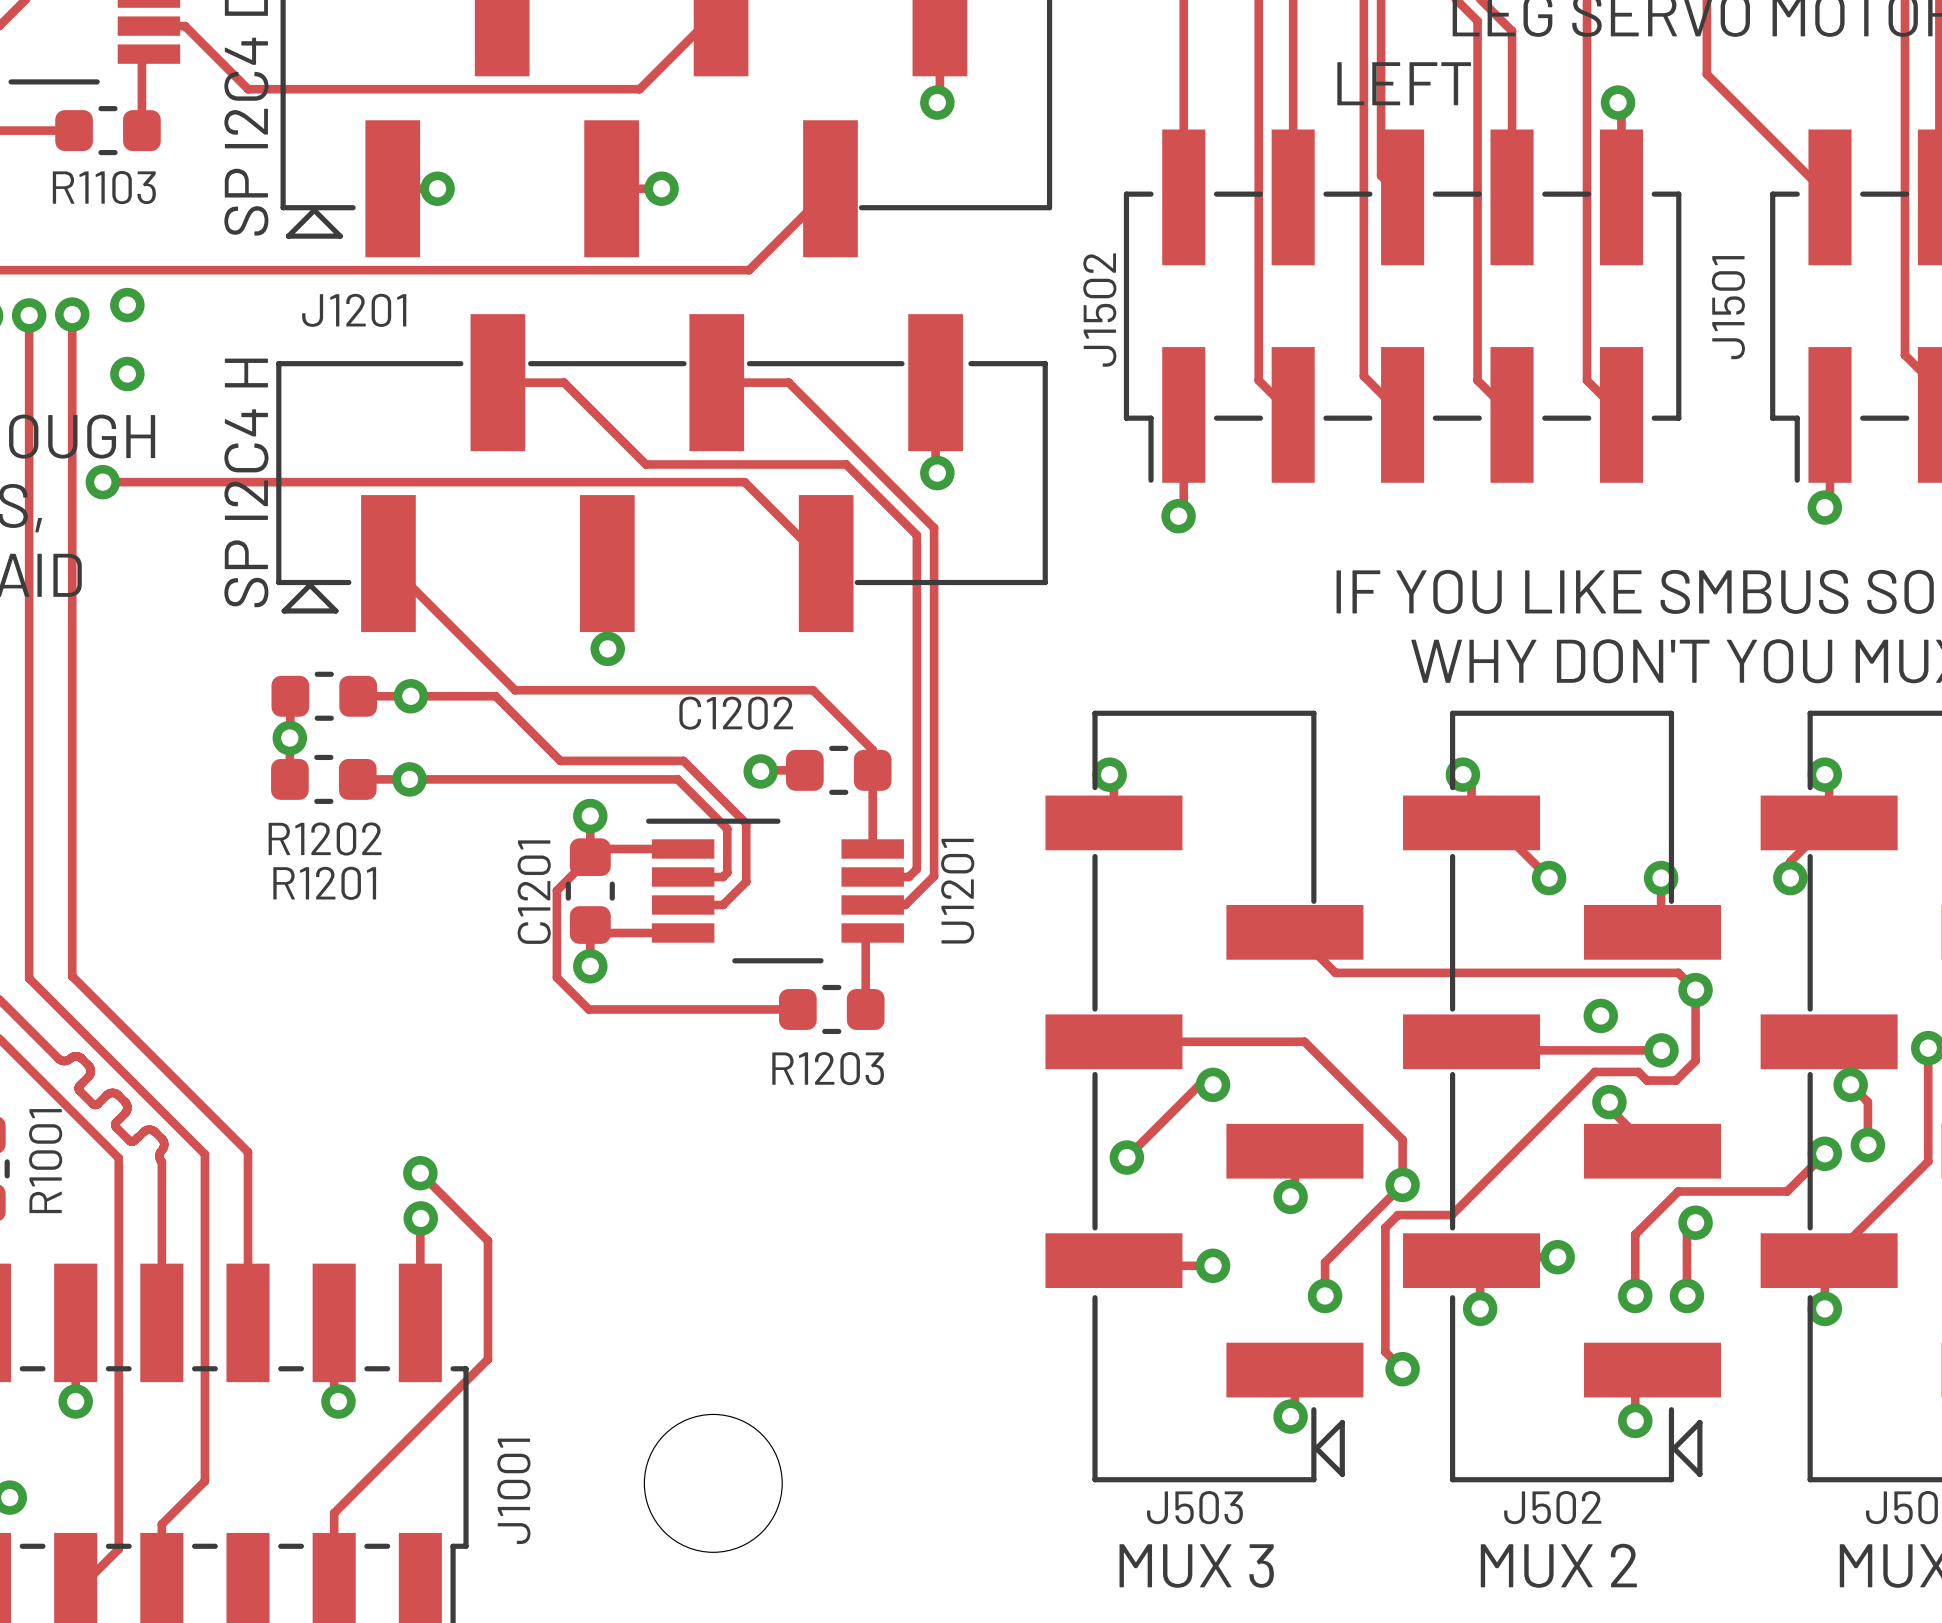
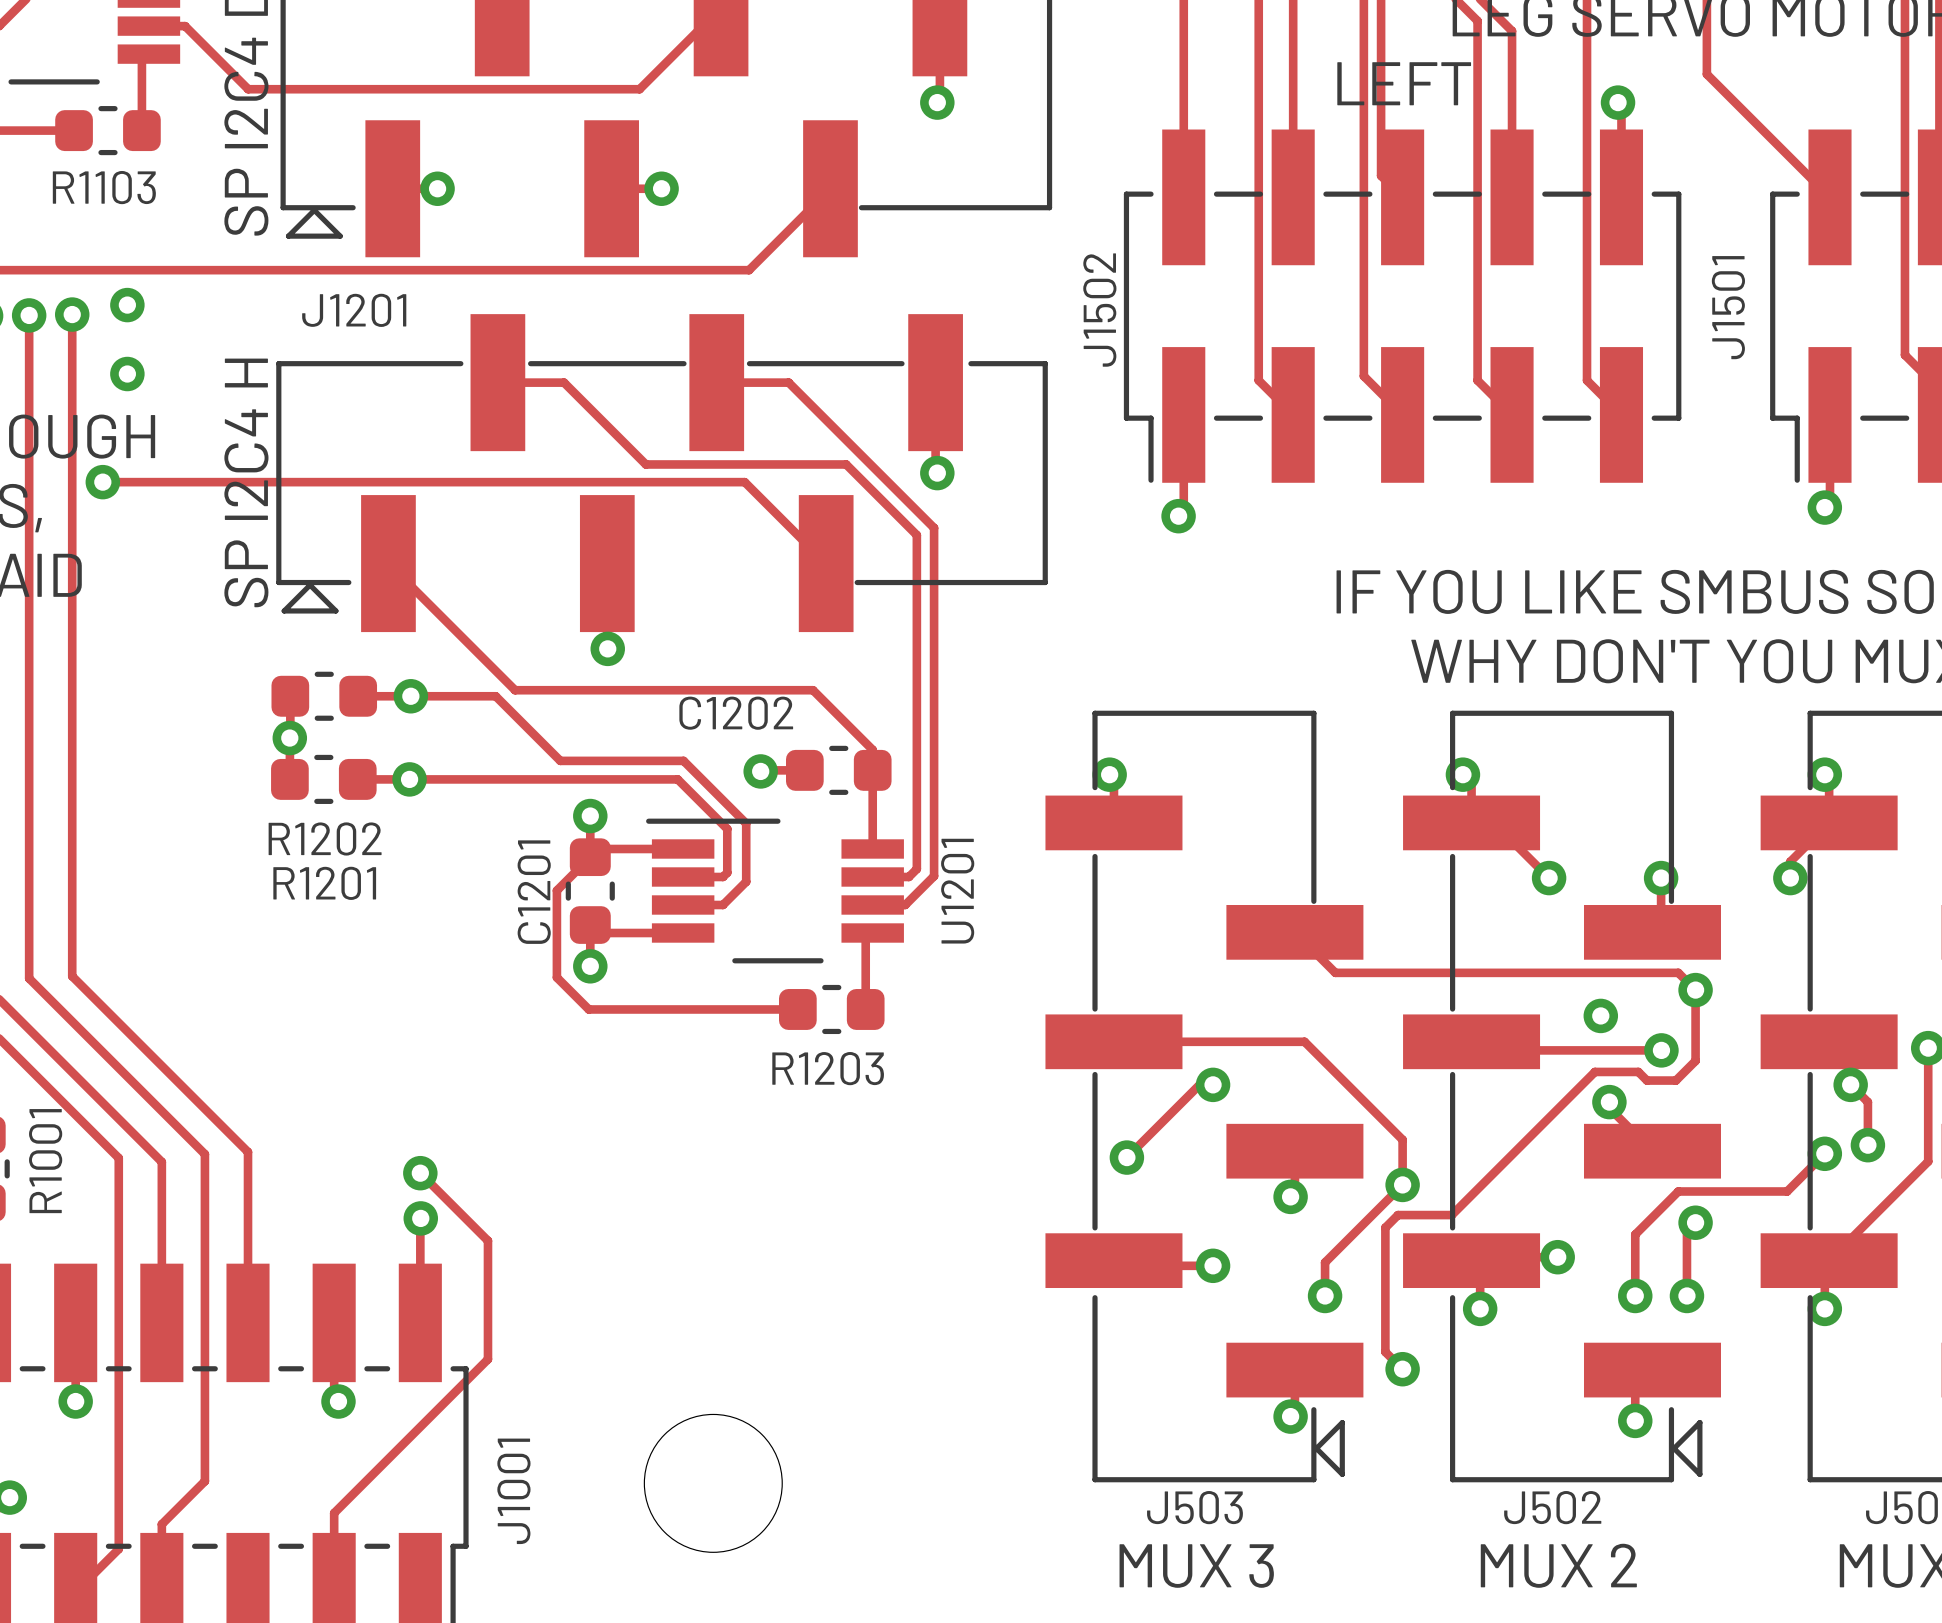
track: (58, 1058) (65, 1061) (75, 1056) (81, 1058) (89, 1066) (90, 1072) (79, 1086) (79, 1090) (94, 1104) (109, 1093) (118, 1095) (126, 1103) (127, 1108) (115, 1122) (115, 1126) (129, 1140) (133, 1141) (137, 1137) -> (58, 1058) (161, 1161)
track: (137, 1137) (145, 1130) (150, 1129) (161, 1138) (164, 1145) (159, 1155) (161, 1161) -> none

